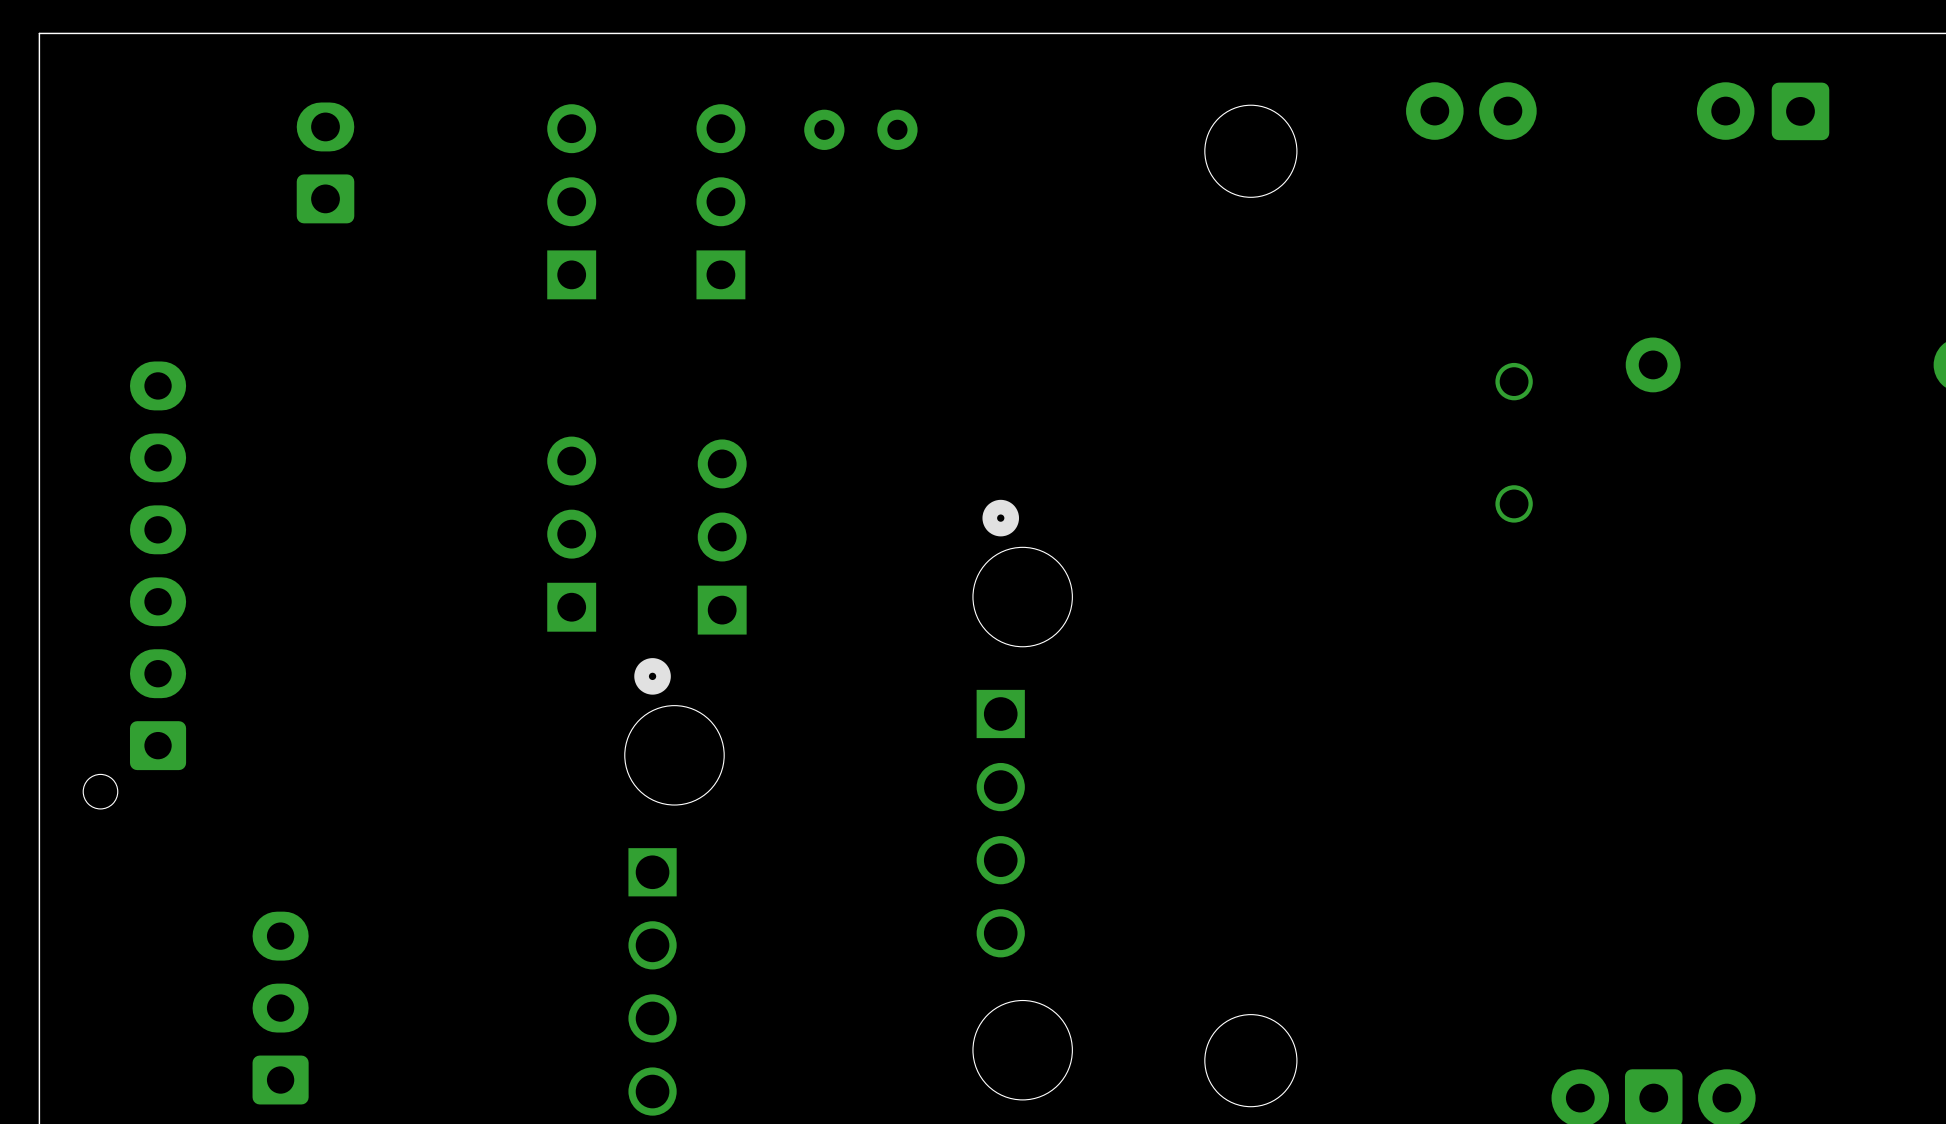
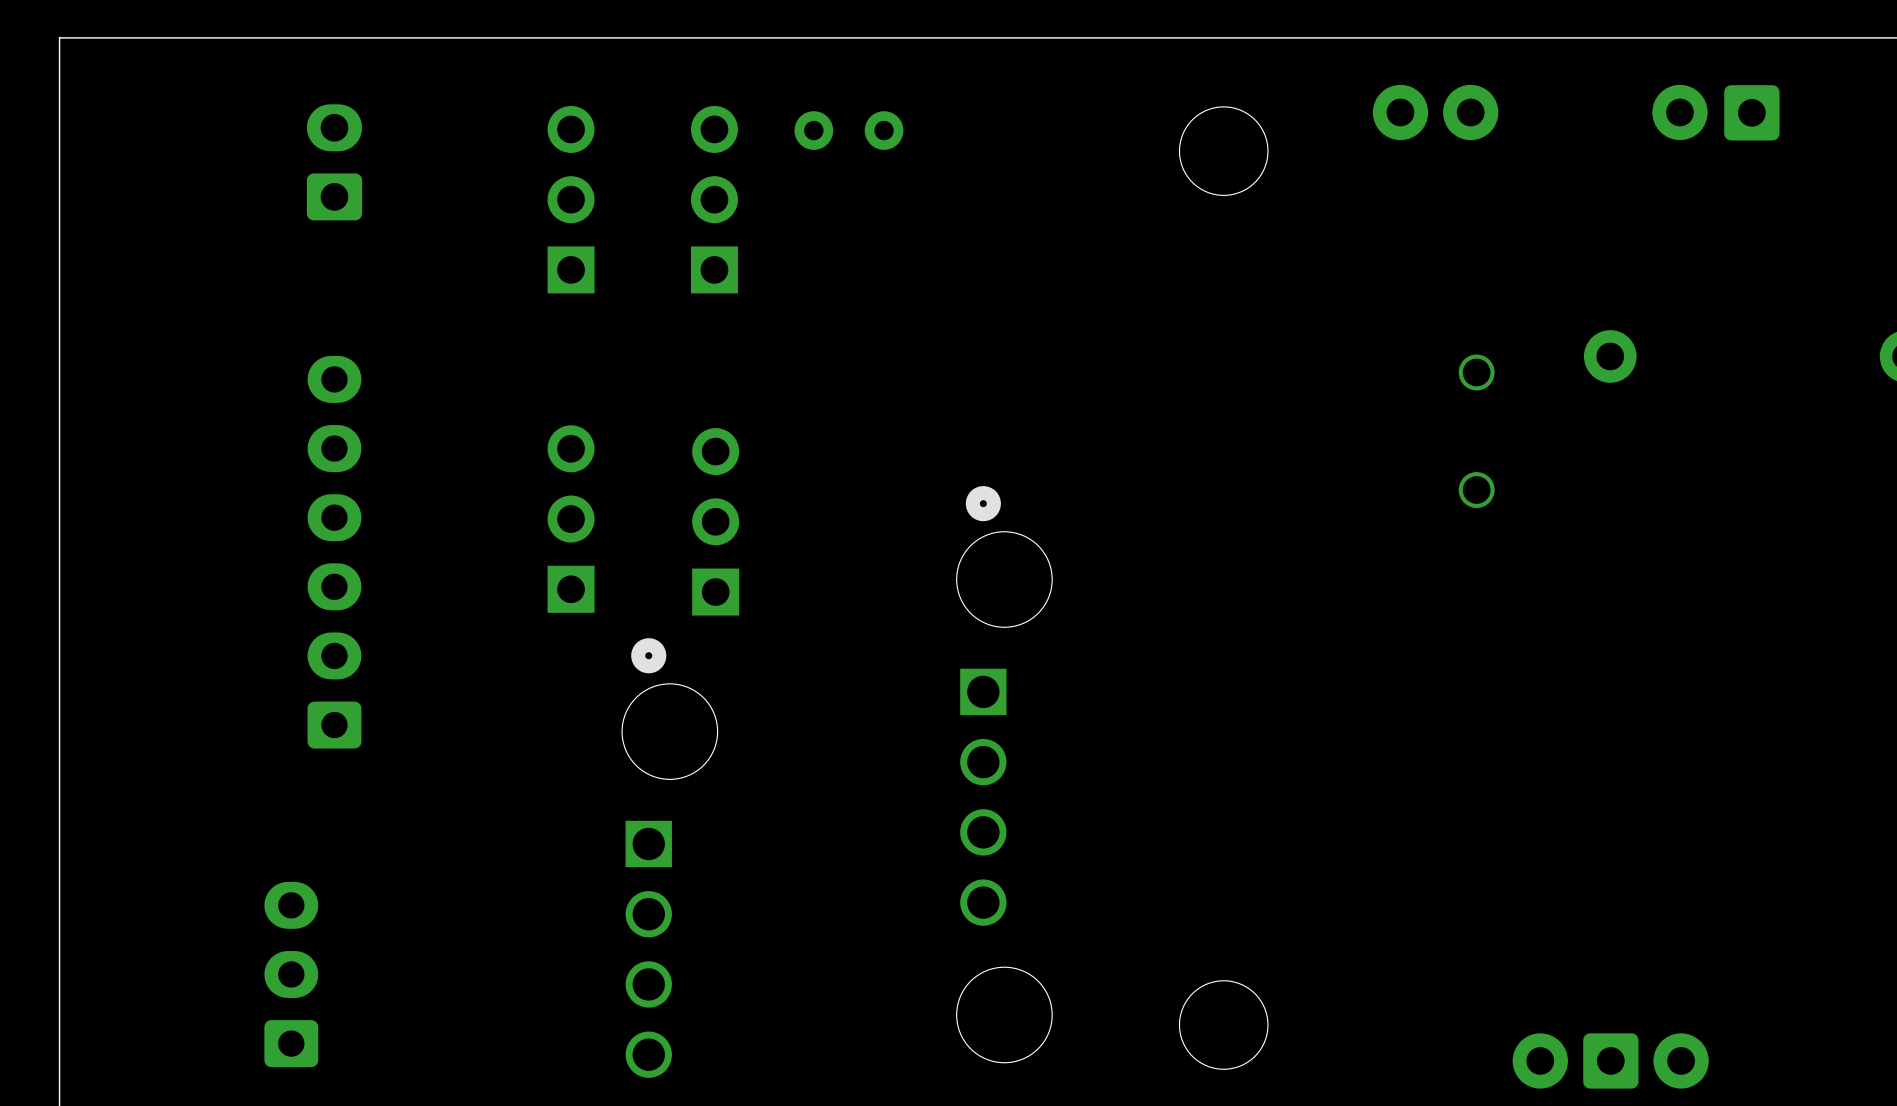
part: none -> (334, 552)
part: (134, 585) -> none

